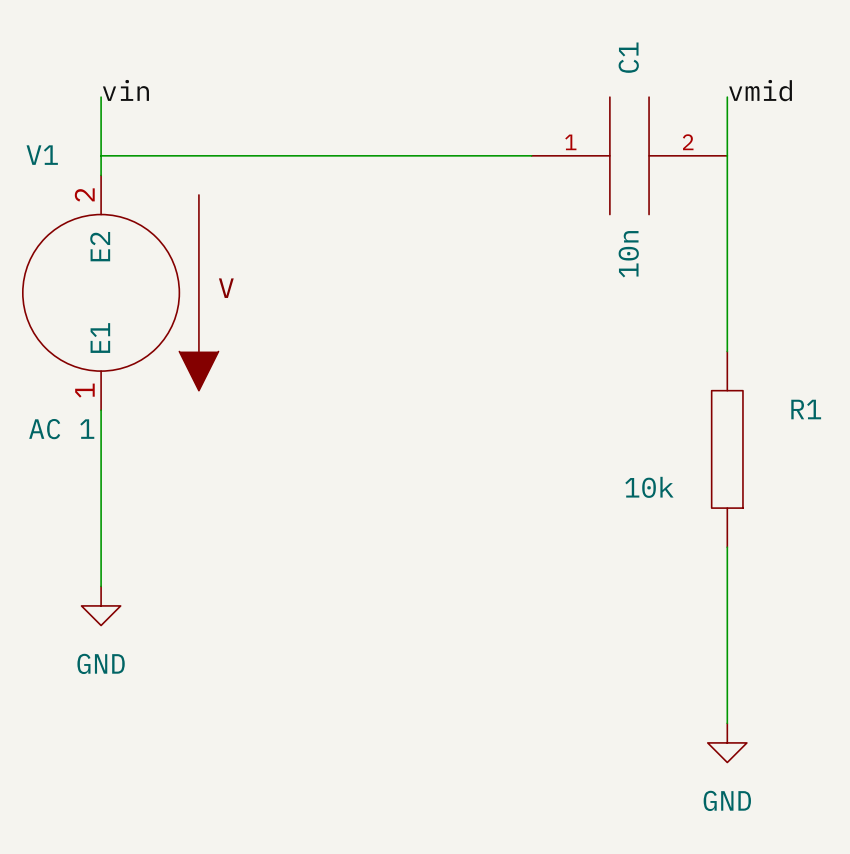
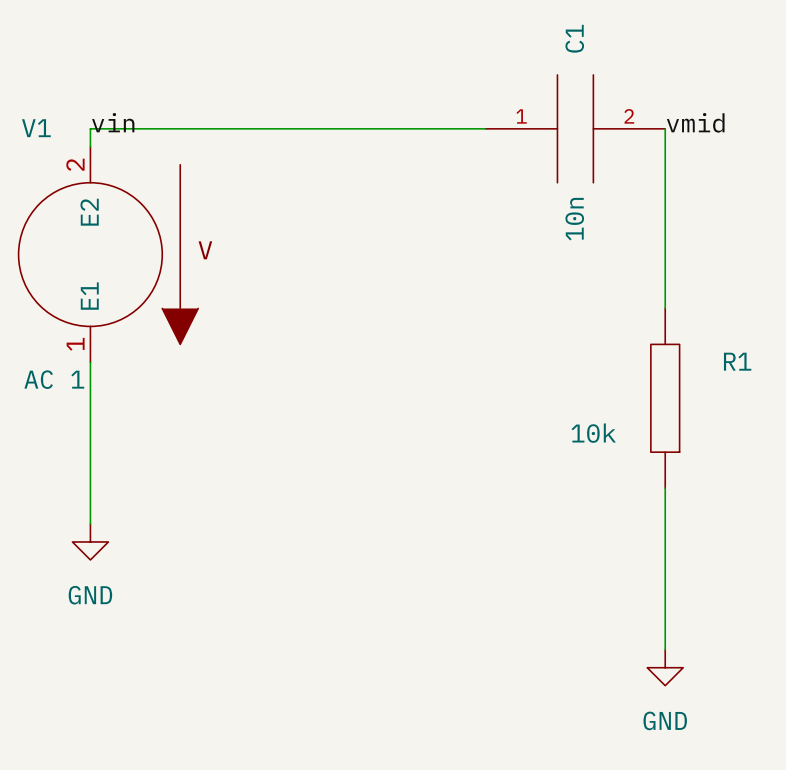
label position: vin (125, 90) -> vin (113, 122)
label position: vmid (760, 90) -> vmid (695, 122)
wire: (101, 97) (101, 155) -> none
wire: (727, 97) (727, 155) -> none

